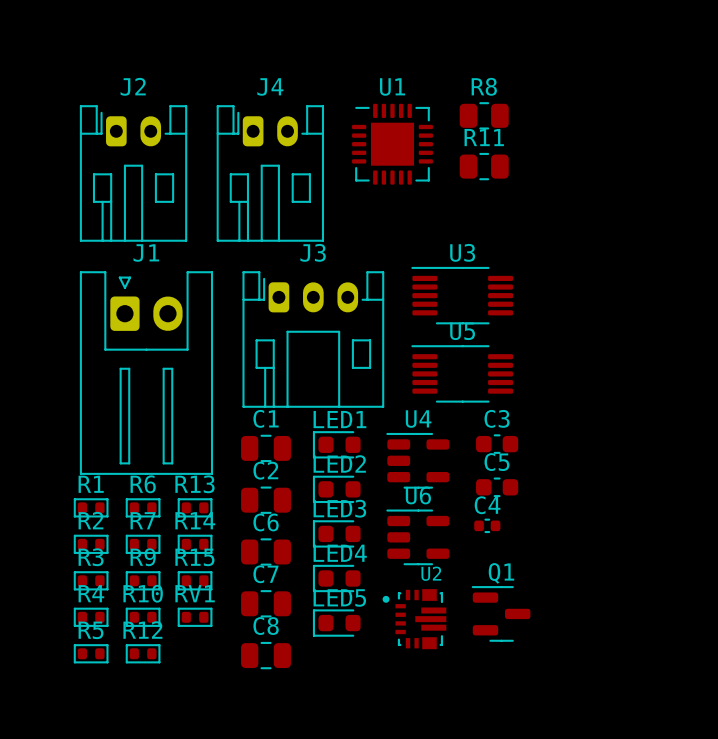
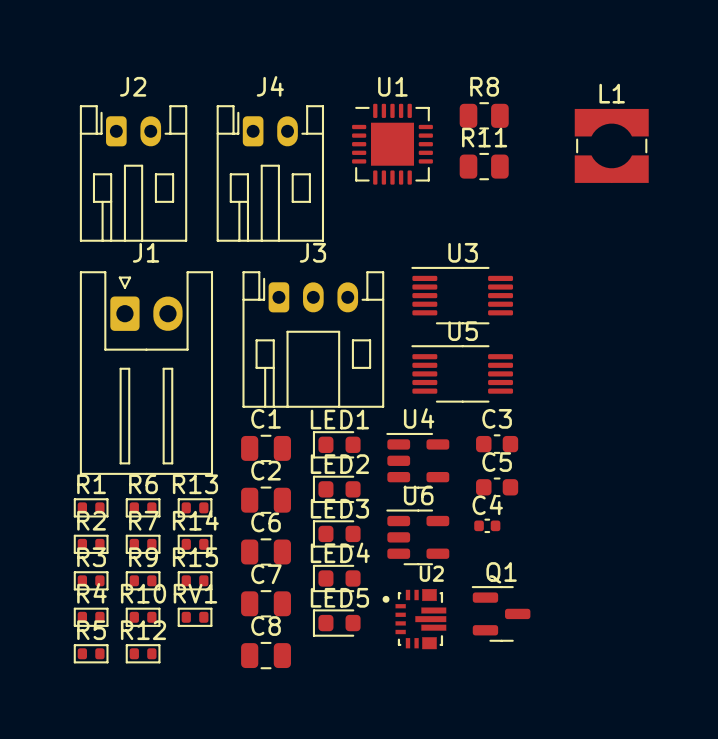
L1: none -> (611, 145)

